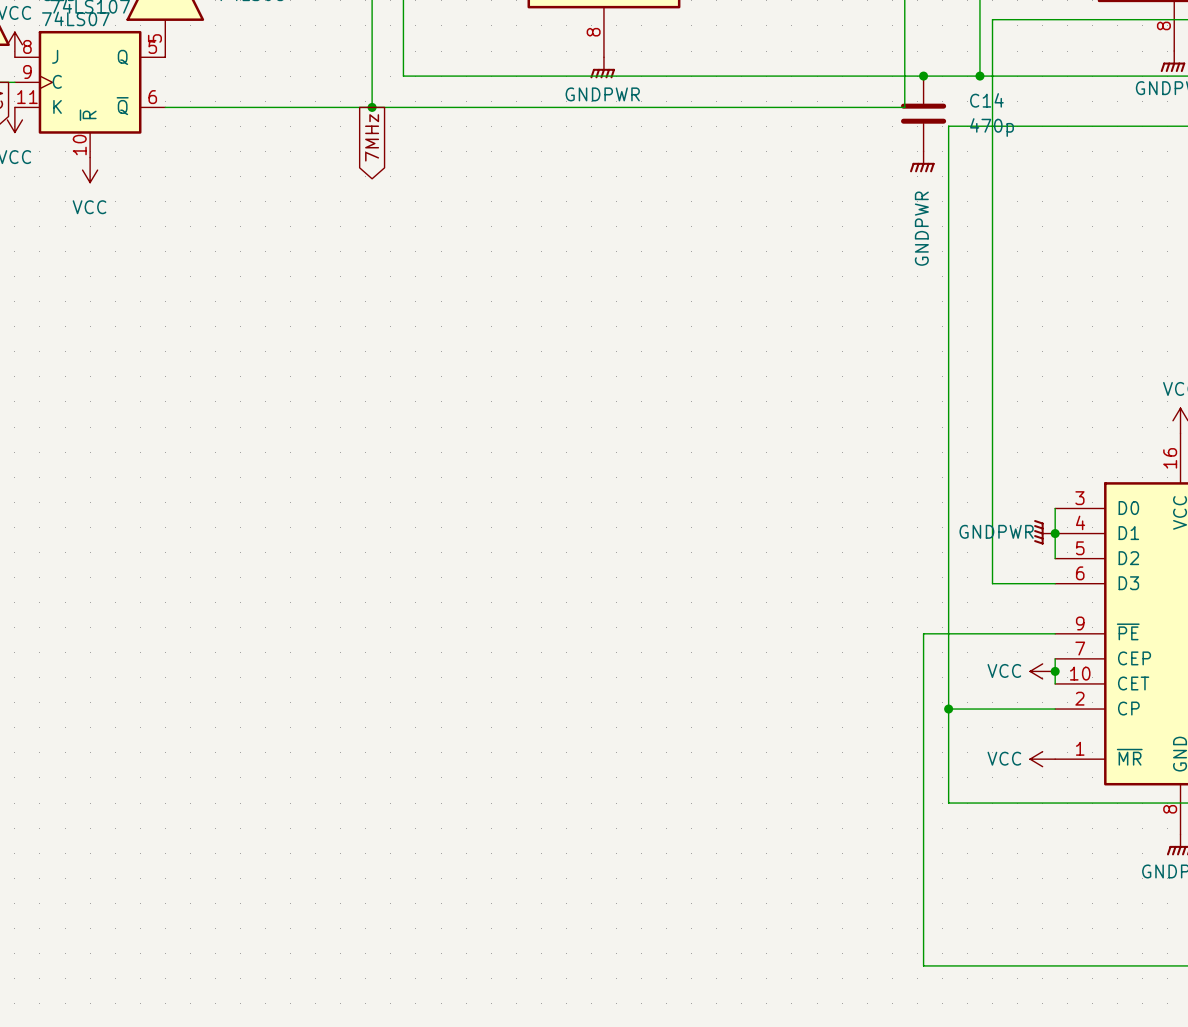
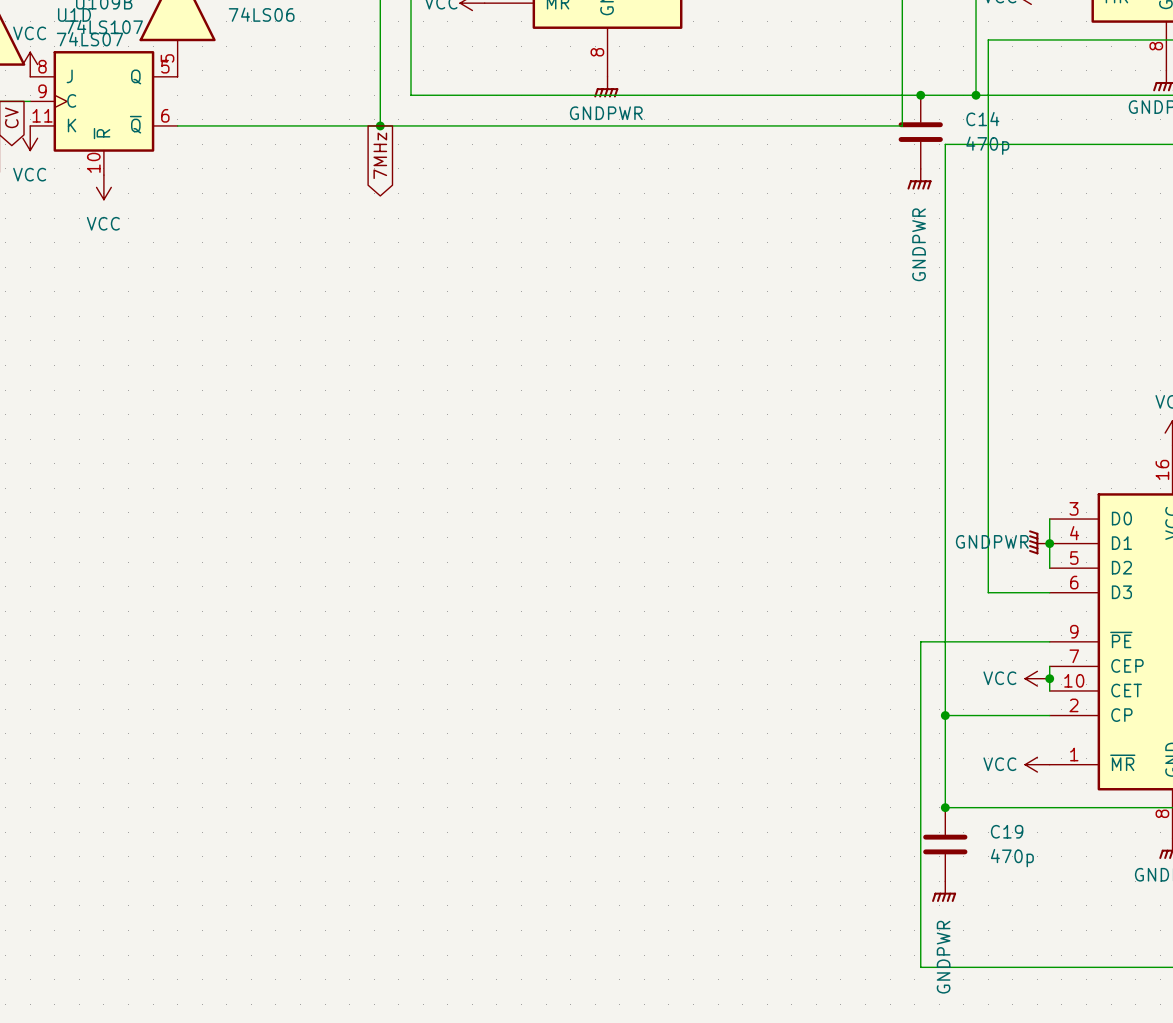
junction: none -> (945, 807)
C19: none -> 470p (945, 844)
power symbol: none -> GNDPWR (944, 891)

